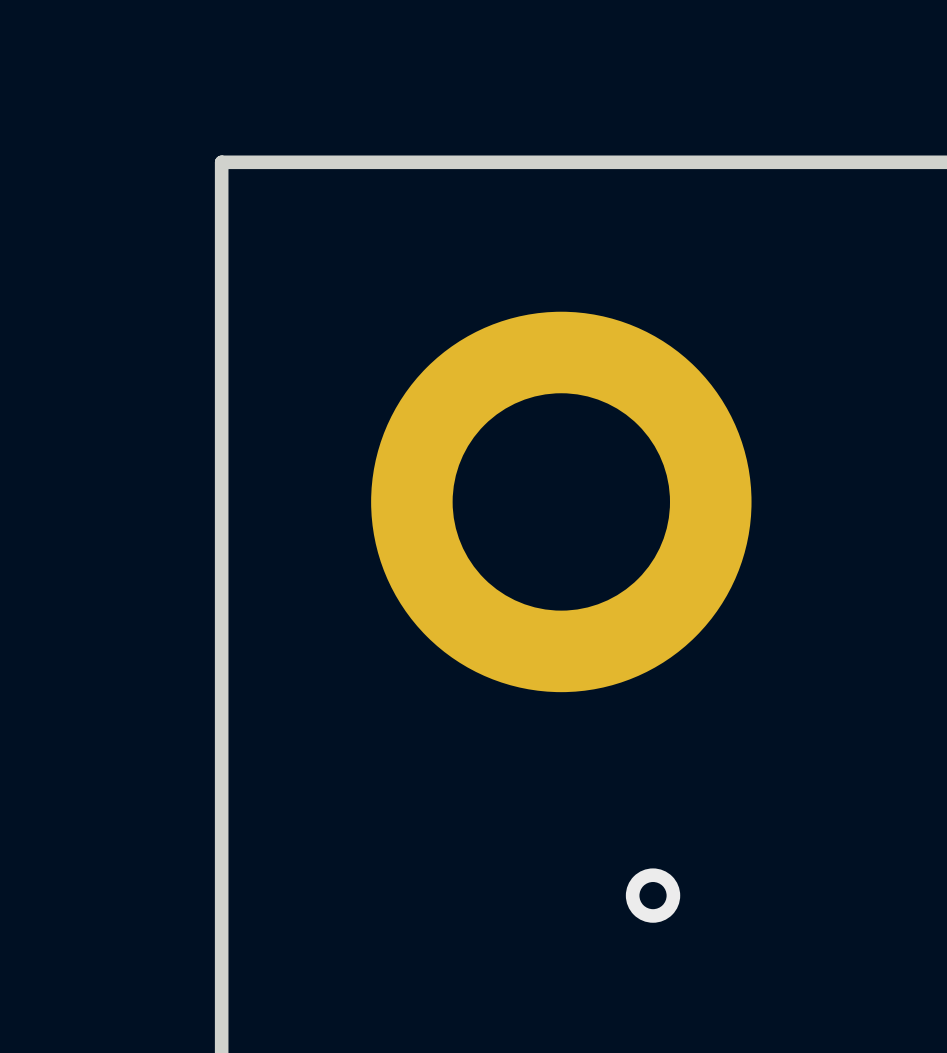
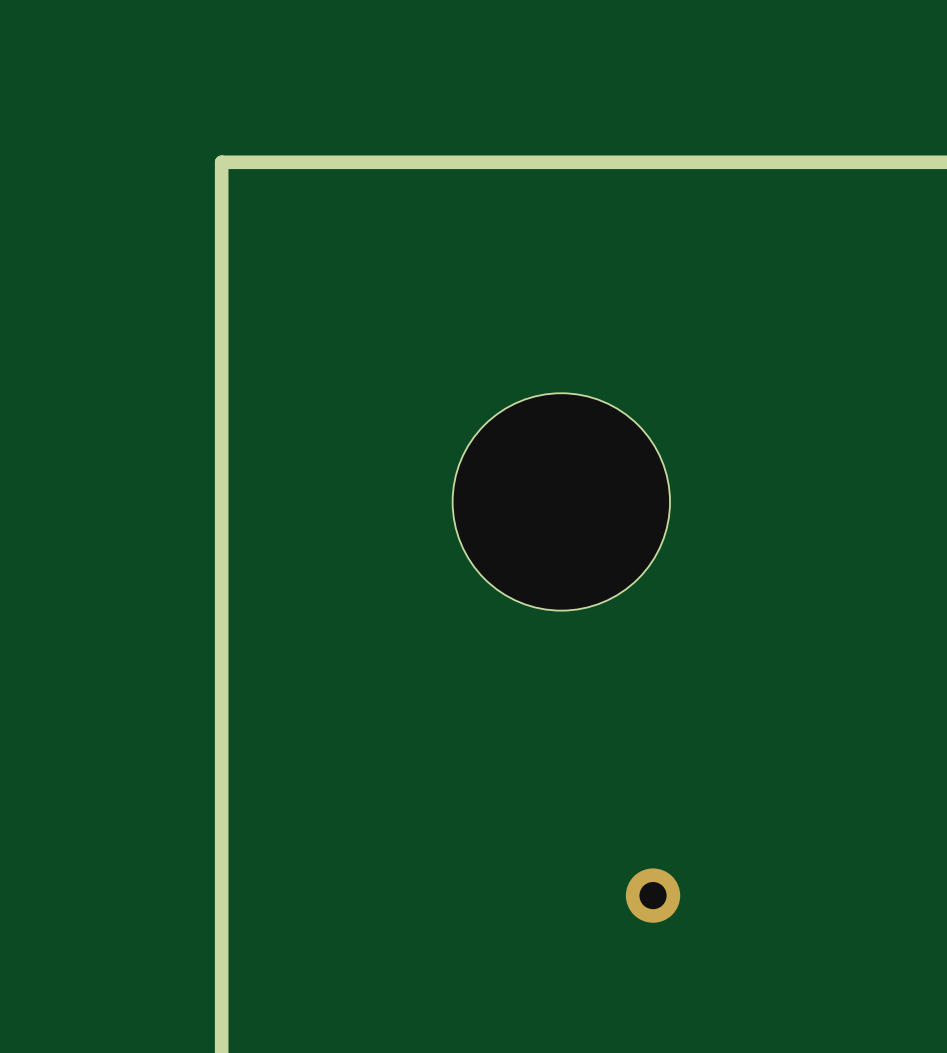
part footprint: [371, 311, 752, 693] -> [452, 393, 671, 611]

